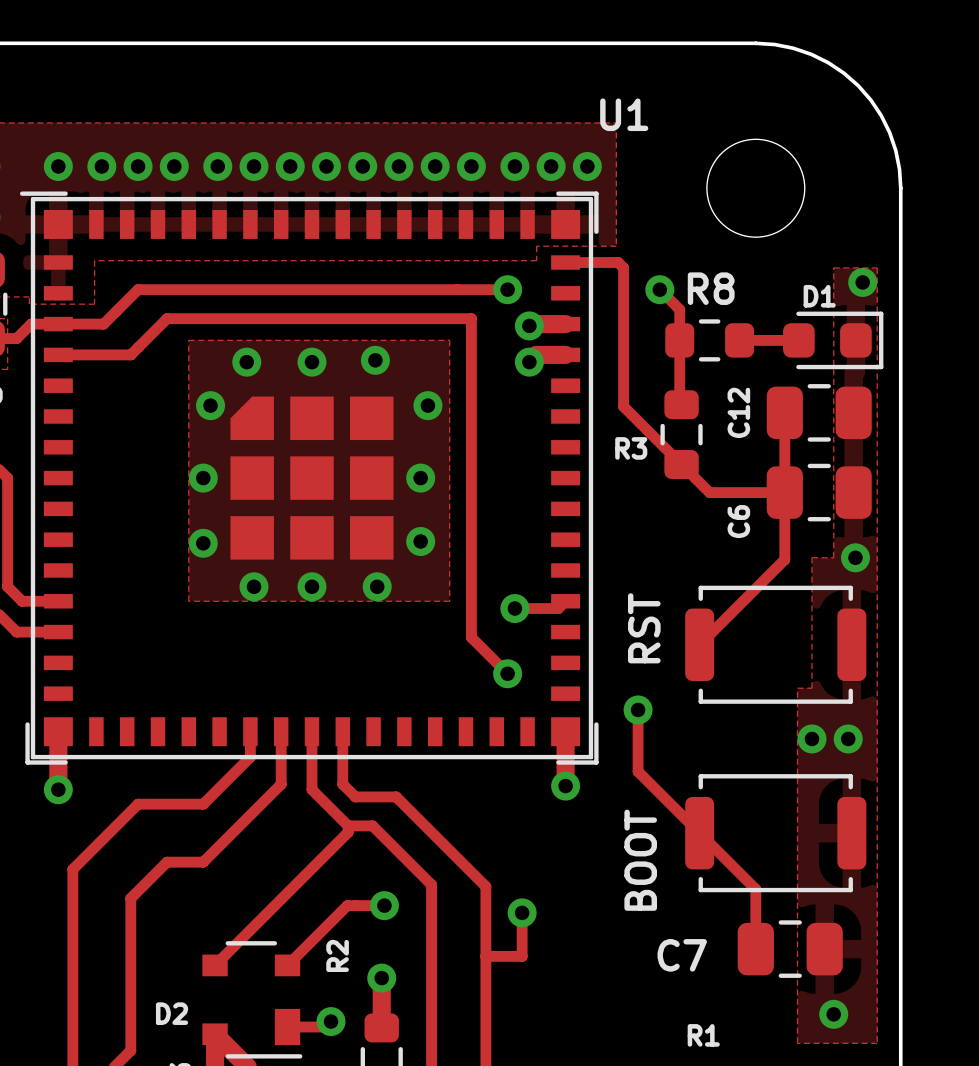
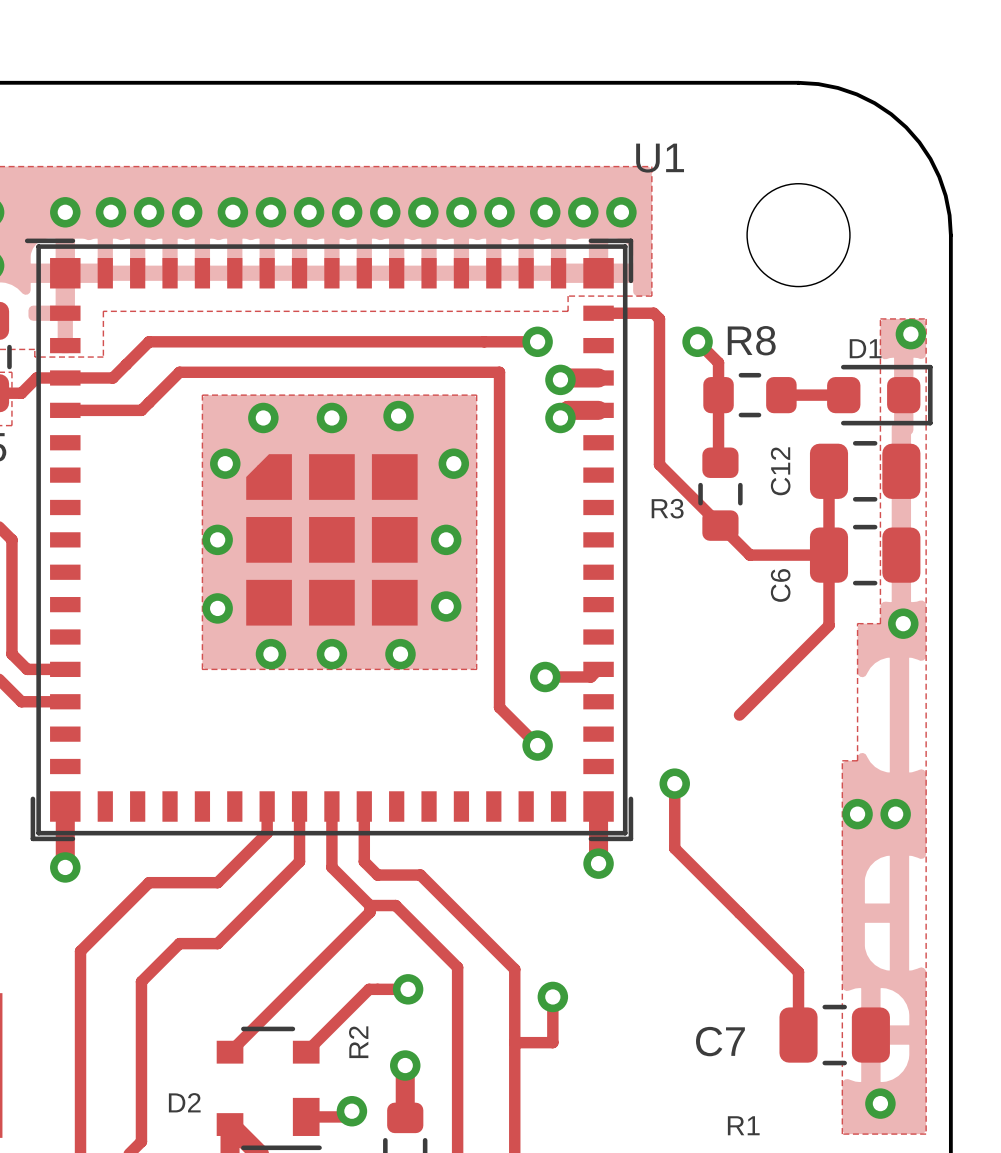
RST: (775, 644) -> none
BOOT: (775, 833) -> none

